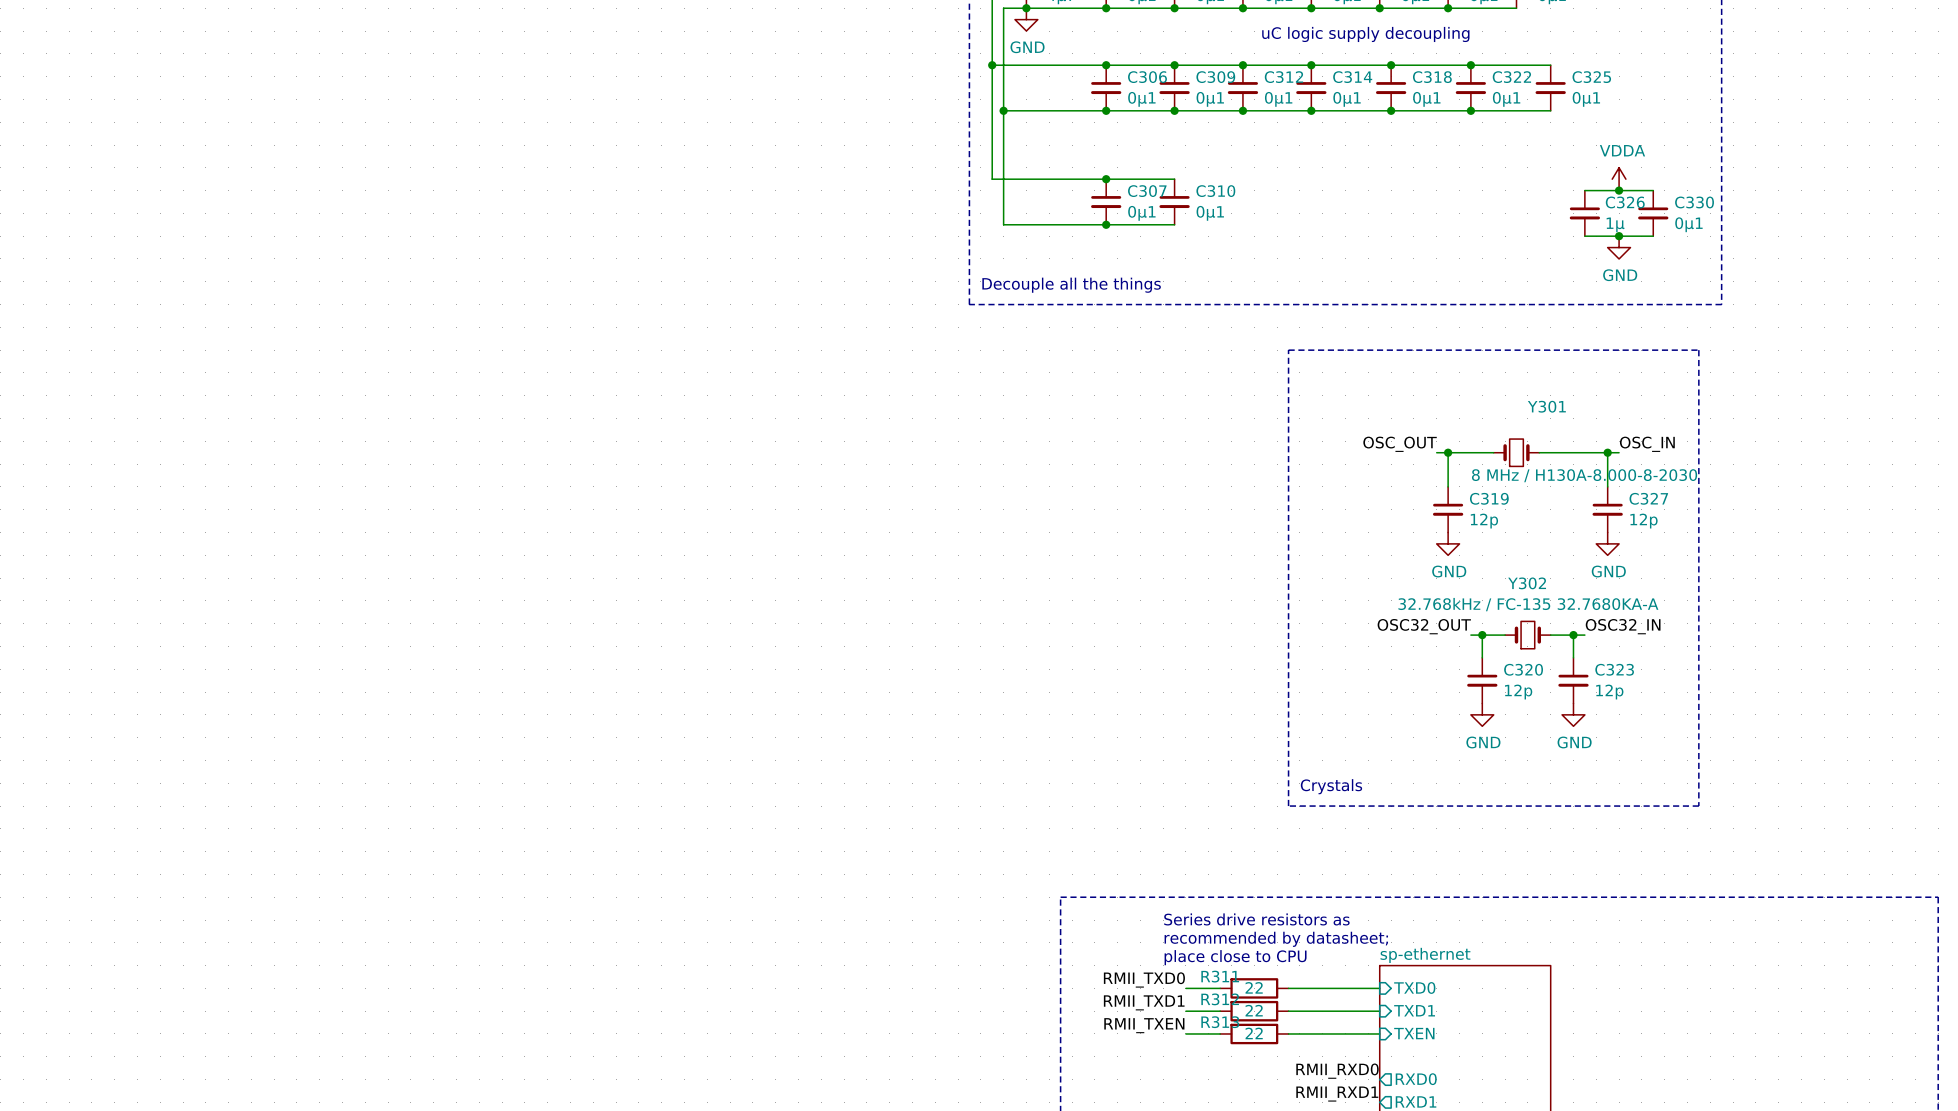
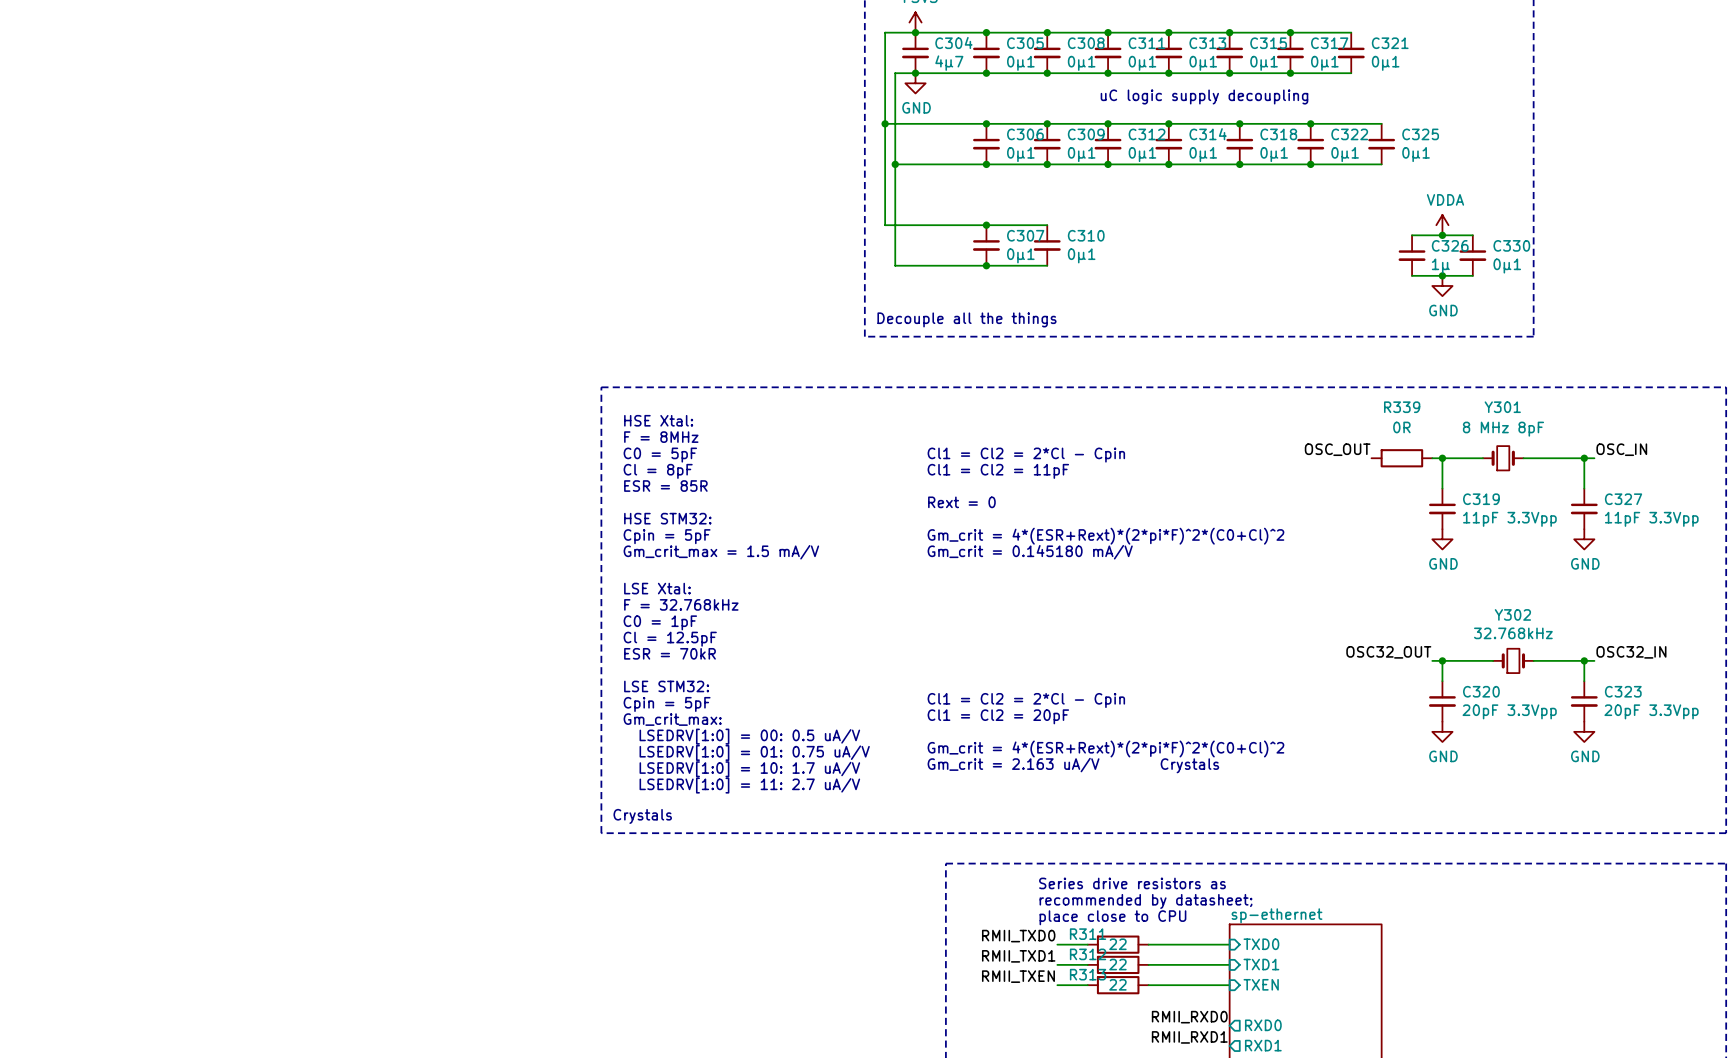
line: (1288, 350) (1698, 350) (1698, 806) (1288, 806) (1288, 350) -> none
line: none -> (601, 387) (601, 833) (1726, 833) (1726, 387) (601, 387)
text: none -> HSE Xtal: (658, 420)
Y301 name position: Y301 (1546, 406) -> Y301 (1502, 407)
text: none -> F = 8MHz (661, 437)
text: none -> C0 = 5pF (660, 455)
text: none -> Cl1 = Cl2 = 2*Cl - Cpin (1026, 455)
R339: none -> 0R (1401, 458)
junction: none -> (1584, 458)
label position: OSC_OUT (1400, 444) -> OSC_OUT (1337, 449)
label position: OSC_IN (1647, 444) -> OSC_IN (1621, 449)
wire: (1436, 452) (1493, 452) -> (1432, 458) (1482, 458)
wire: (1448, 452) (1448, 486) -> (1442, 458) (1442, 488)
junction: (1448, 452) -> none
Y301 position: (1516, 452) -> (1503, 458)
wire: (1539, 452) (1619, 452) -> (1523, 458) (1594, 458)
wire: (1607, 452) (1607, 486) -> (1584, 458) (1584, 488)
junction position: (1607, 452) -> (1442, 458)
text: none -> Cl = 8pF (658, 471)
text: none -> Cl1 = Cl2 = 11pF (998, 471)
text: none -> ESR = 85R (665, 486)
Y301 value: 8 MHz / H130A-8.000-8-2030 (1584, 475) -> 8 MHz 8pF (1503, 429)
text: none -> Rext = 0 (961, 502)
text: none -> HSE STM32: (667, 518)
C319 position: (1448, 509) -> (1442, 508)
C327 position: (1607, 509) -> (1584, 508)
C319 value: 12p (1484, 521) -> 11pF 3.3Vpp (1509, 519)
C327 value: 12p (1643, 521) -> 11pF 3.3Vpp (1651, 519)
text: none -> Cpin = 5pF (667, 536)
text: none -> Gm_crit = 4*(ESR+Rext)*(2*pi*F)^2*(C0+Cl)^2 (1105, 536)
power symbol: none -> GND (1584, 539)
power symbol: GND (1448, 543) -> none
power symbol position: GND (1607, 543) -> GND (1442, 539)
text: none -> Gm_crit_max = 1.5 mA/V (721, 552)
text: none -> Gm_crit = 0.145180 mA/V (1030, 552)
text: none -> LSE Xtal: (657, 588)
Y302 value: 32.768kHz / FC-135 32.7680KA-A (1528, 604) -> 32.768kHz (1513, 633)
text: none -> F = 32.768kHz (681, 604)
text: none -> C0 = 1pF (660, 622)
label position: OSC32_OUT (1424, 626) -> OSC32_OUT (1388, 652)
label position: OSC32_IN (1623, 626) -> OSC32_IN (1631, 652)
wire: (1470, 635) (1505, 635) -> none
wire: (1482, 635) (1482, 657) -> none
junction: (1482, 635) -> none
Y302 position: (1527, 635) -> (1513, 660)
wire: (1550, 635) (1584, 635) -> none
wire: (1573, 635) (1573, 657) -> (1442, 660) (1442, 681)
junction: (1573, 635) -> none
text: none -> Cl = 12.5pF (670, 639)
text: none -> ESR = 70kR (669, 653)
wire: none -> (1432, 660) (1493, 660)
junction: none -> (1442, 660)
wire: none -> (1533, 660) (1594, 660)
wire: none -> (1584, 660) (1584, 681)
junction: none -> (1584, 660)
C320 position: (1482, 680) -> (1442, 701)
C323 position: (1573, 680) -> (1584, 701)
C320 value: 12p (1518, 692) -> 20pF 3.3Vpp (1509, 711)
C323 value: 12p (1609, 692) -> 20pF 3.3Vpp (1651, 711)
text: none -> LSE STM32: (666, 686)
text: none -> Cl1 = Cl2 = 2*Cl - Cpin (1026, 700)
power symbol: GND (1482, 714) -> none
power symbol position: GND (1573, 714) -> GND (1442, 731)
text: none -> Cpin = 5pF (667, 704)
text: none -> Cl1 = Cl2 = 20pF (998, 716)
text: none -> Gm_crit_max: (672, 719)
power symbol: none -> GND (1584, 731)
text: none -> LSEDRV[1:0] = 00: 0.5 uA/V (749, 736)
text: none -> Gm_crit = 4*(ESR+Rext)*(2*pi*F)^2*(C0+Cl)^2 (1105, 748)
text: none -> LSEDRV[1:0] = 01: 0.75 uA/V (754, 752)
text: none -> Gm_crit = 2.163 uA/V (1013, 765)
text: none -> LSEDRV[1:0] = 10: 1.7 uA/V (749, 769)
text: none -> LSEDRV[1:0] = 11: 2.7 uA/V (749, 785)
text: none -> Crystals (642, 816)

